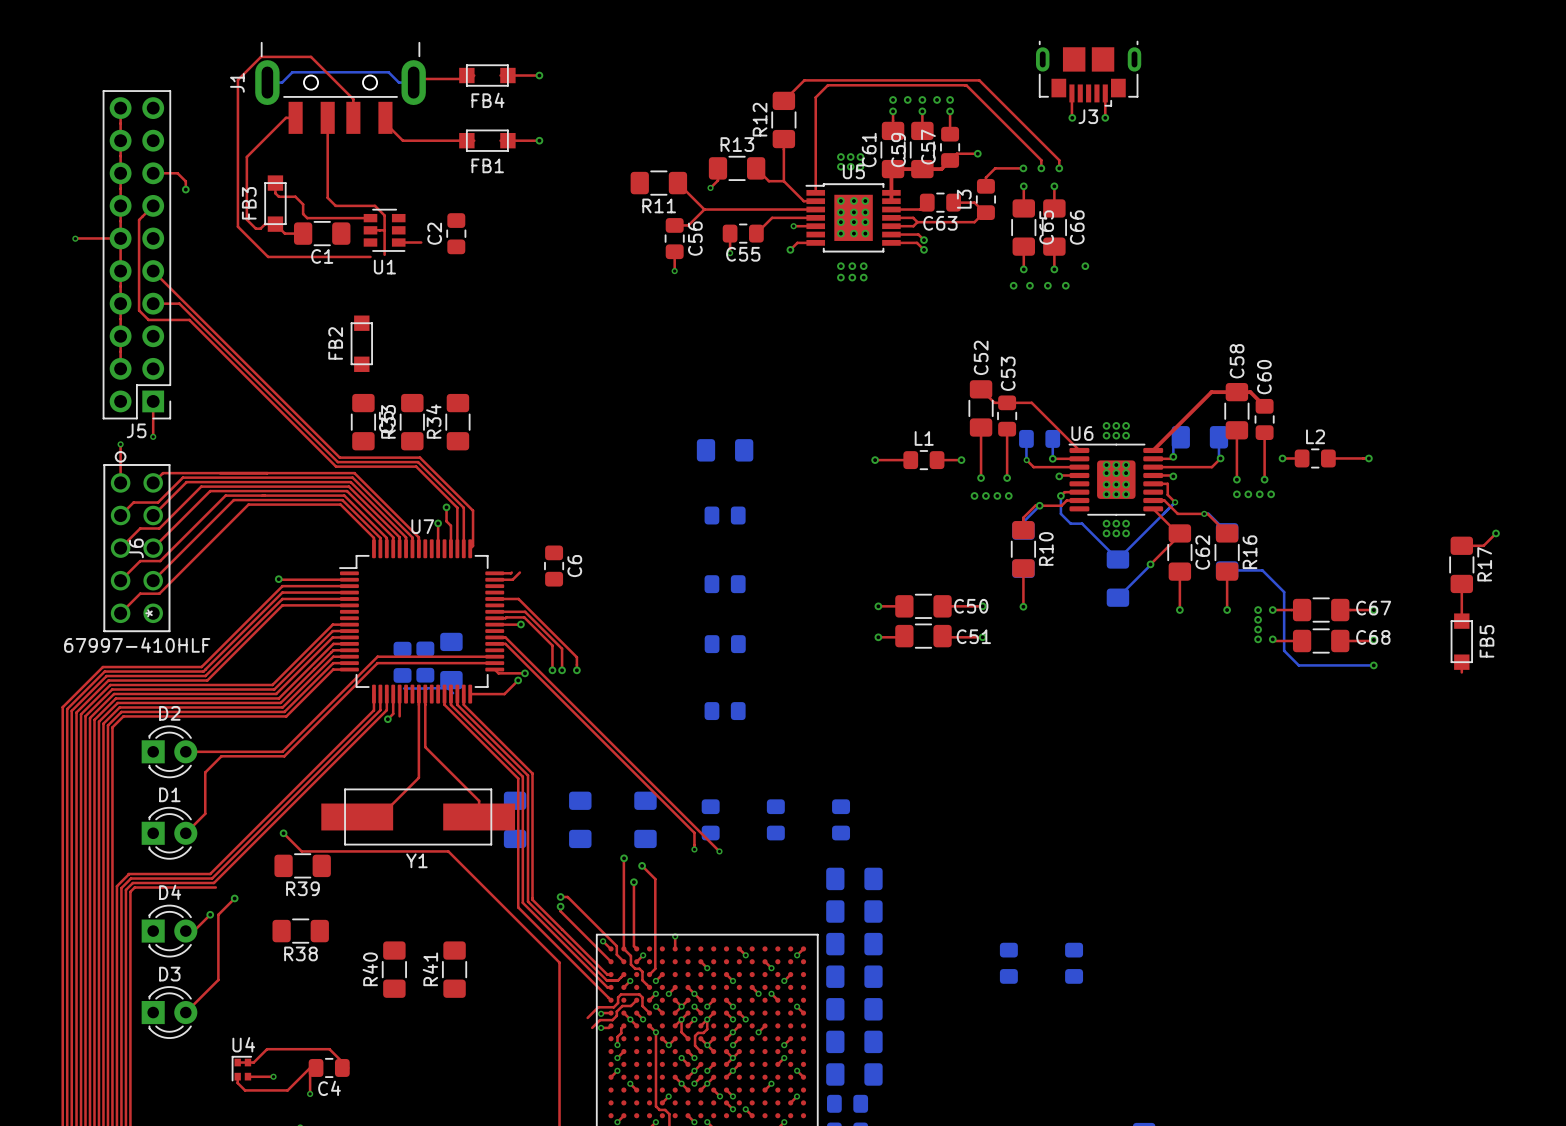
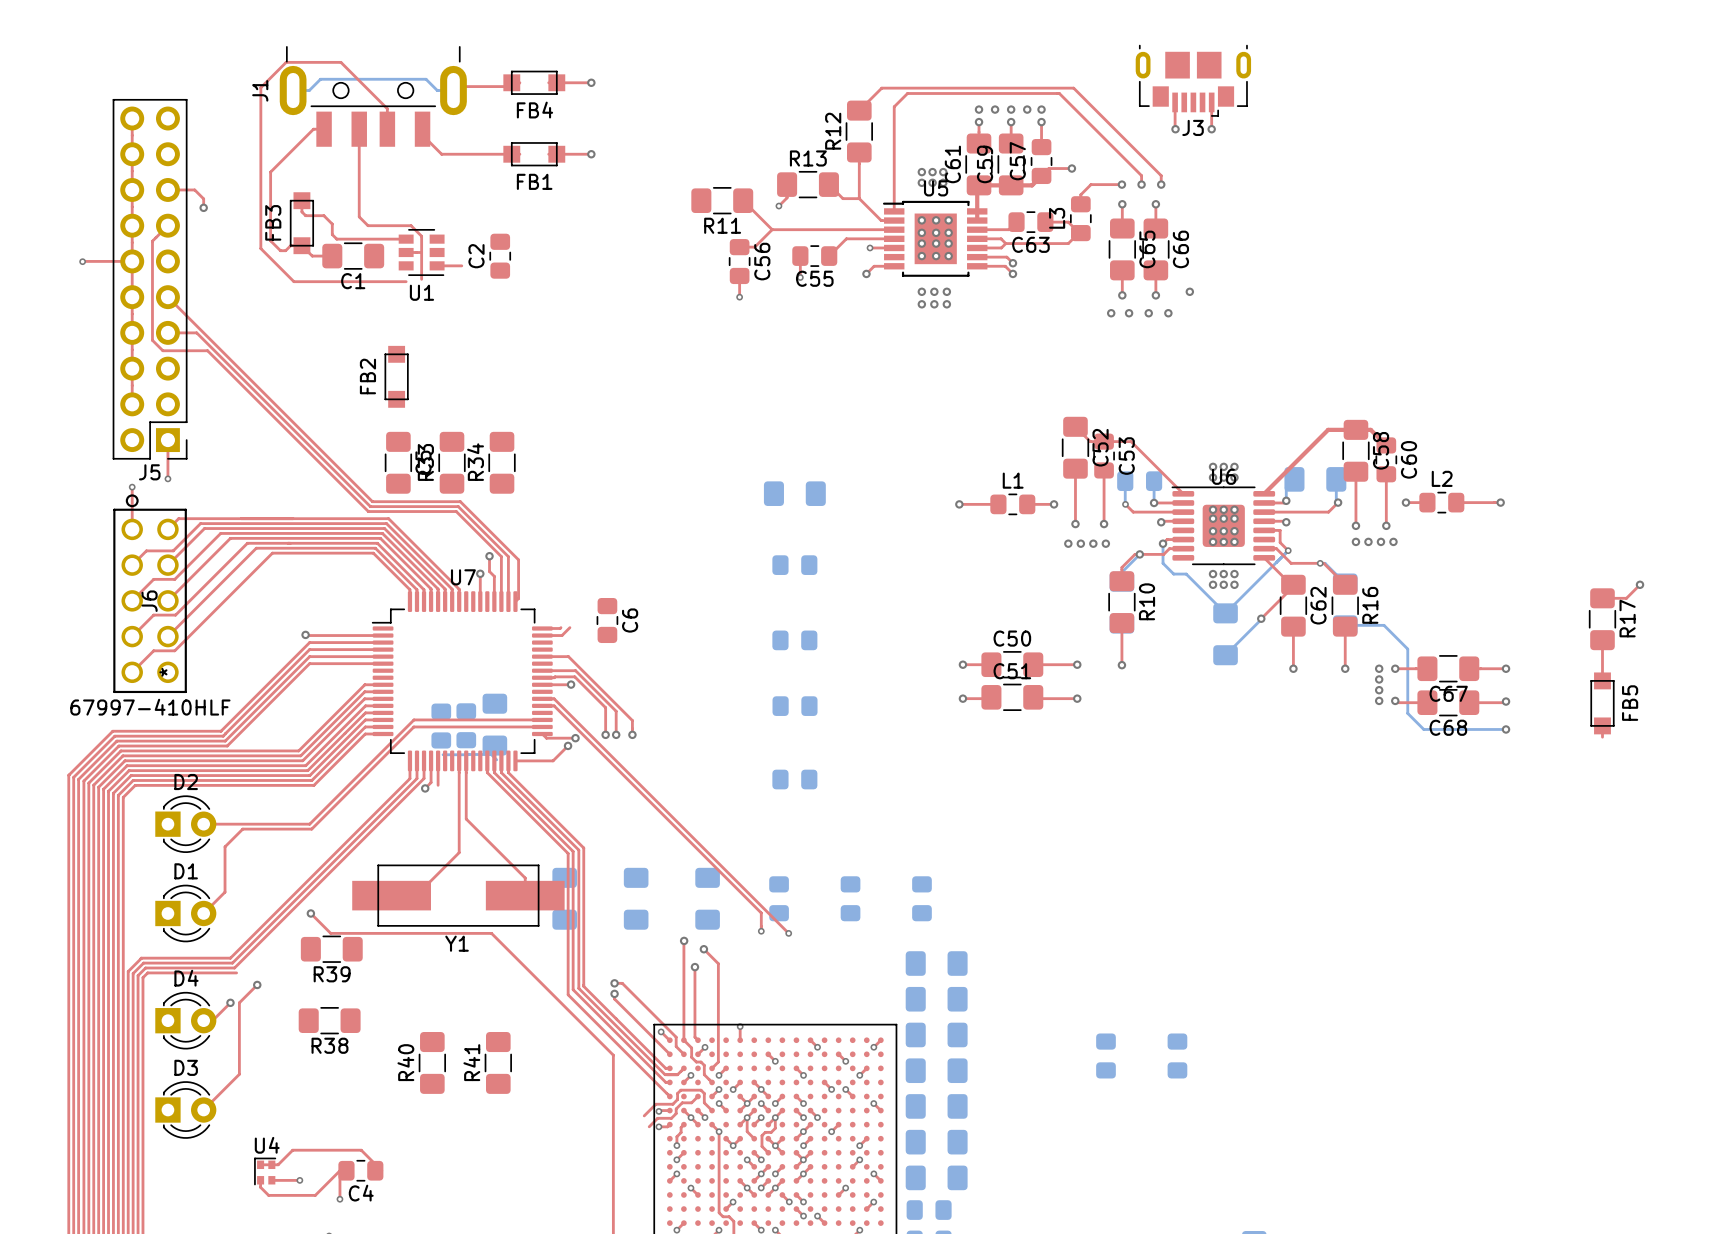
C52 name position: C52 (981, 357) -> C52 (1100, 447)
C58 name position: C58 (1237, 361) -> C58 (1381, 450)
C53 name position: C53 (1008, 373) -> C53 (1126, 456)
C60 name position: C60 (1264, 377) -> C60 (1409, 459)
U6 name position: U6 (1082, 433) -> U6 (1224, 476)
C50 name position: C50 (971, 606) -> C50 (1012, 638)
C67 name position: C67 (1373, 608) -> C67 (1448, 693)
C51 name position: C51 (973, 636) -> C51 (1012, 671)
C68 name position: C68 (1373, 637) -> C68 (1448, 727)

